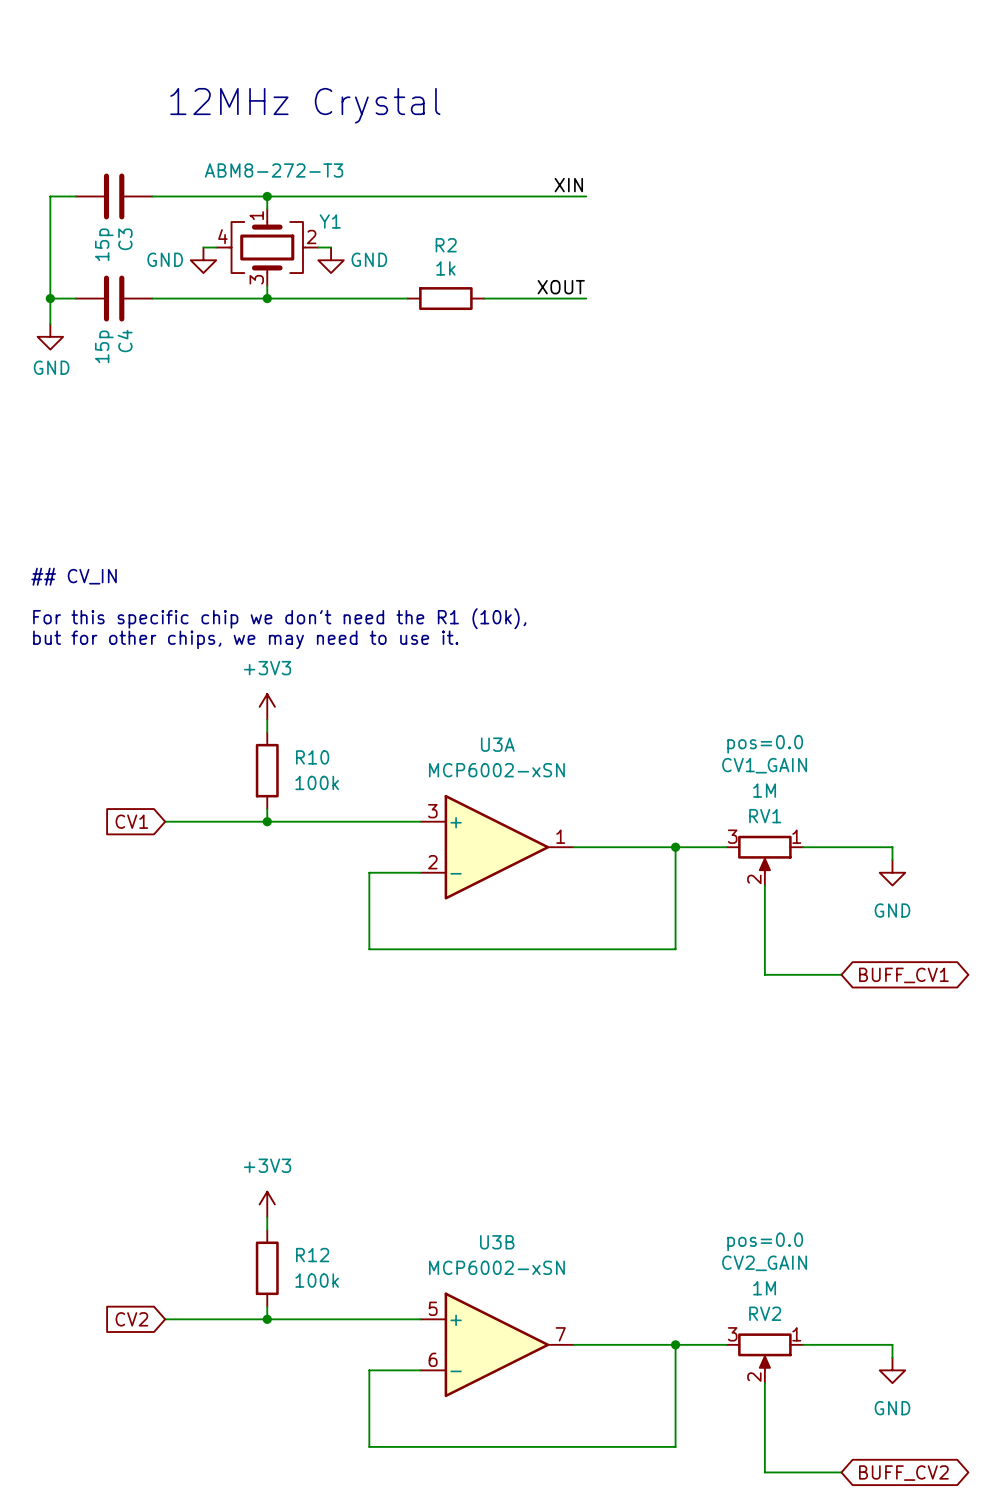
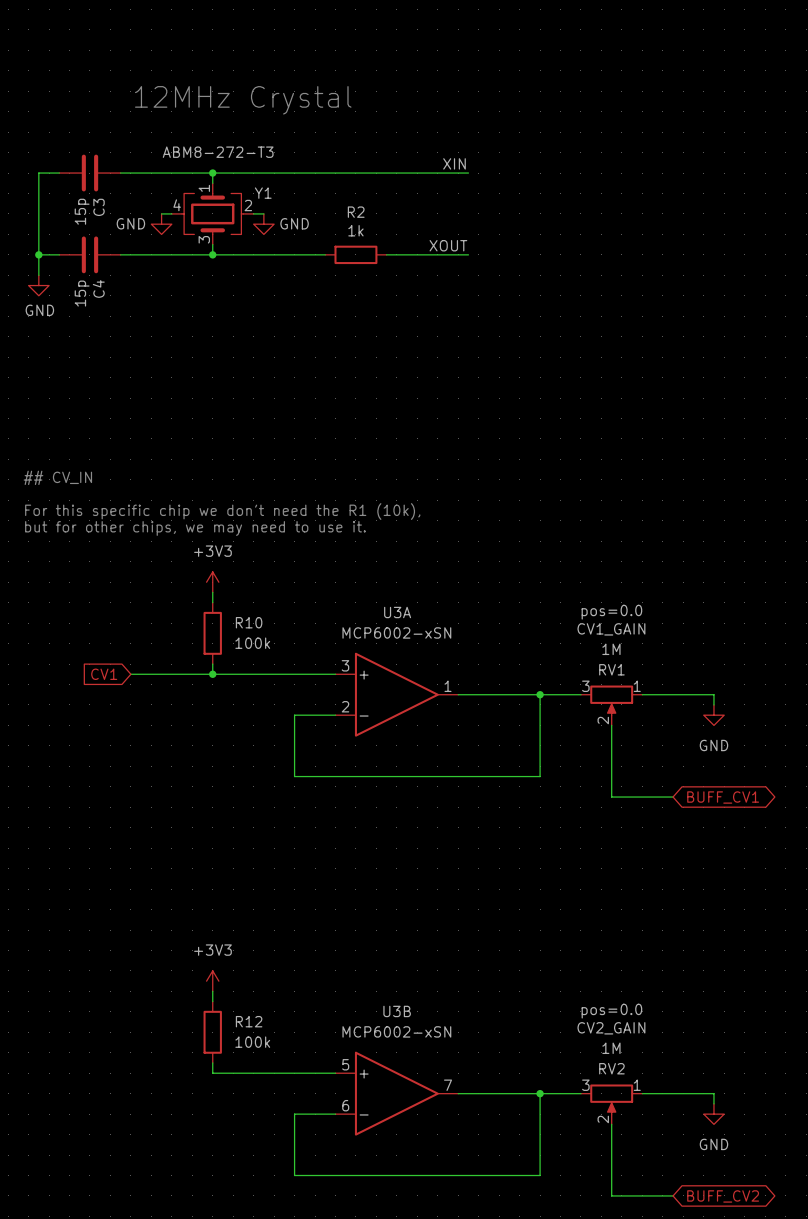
global label: CV2 (131, 1319) -> none
wire: (165, 1319) (267, 1319) -> none
junction: (267, 1319) -> none

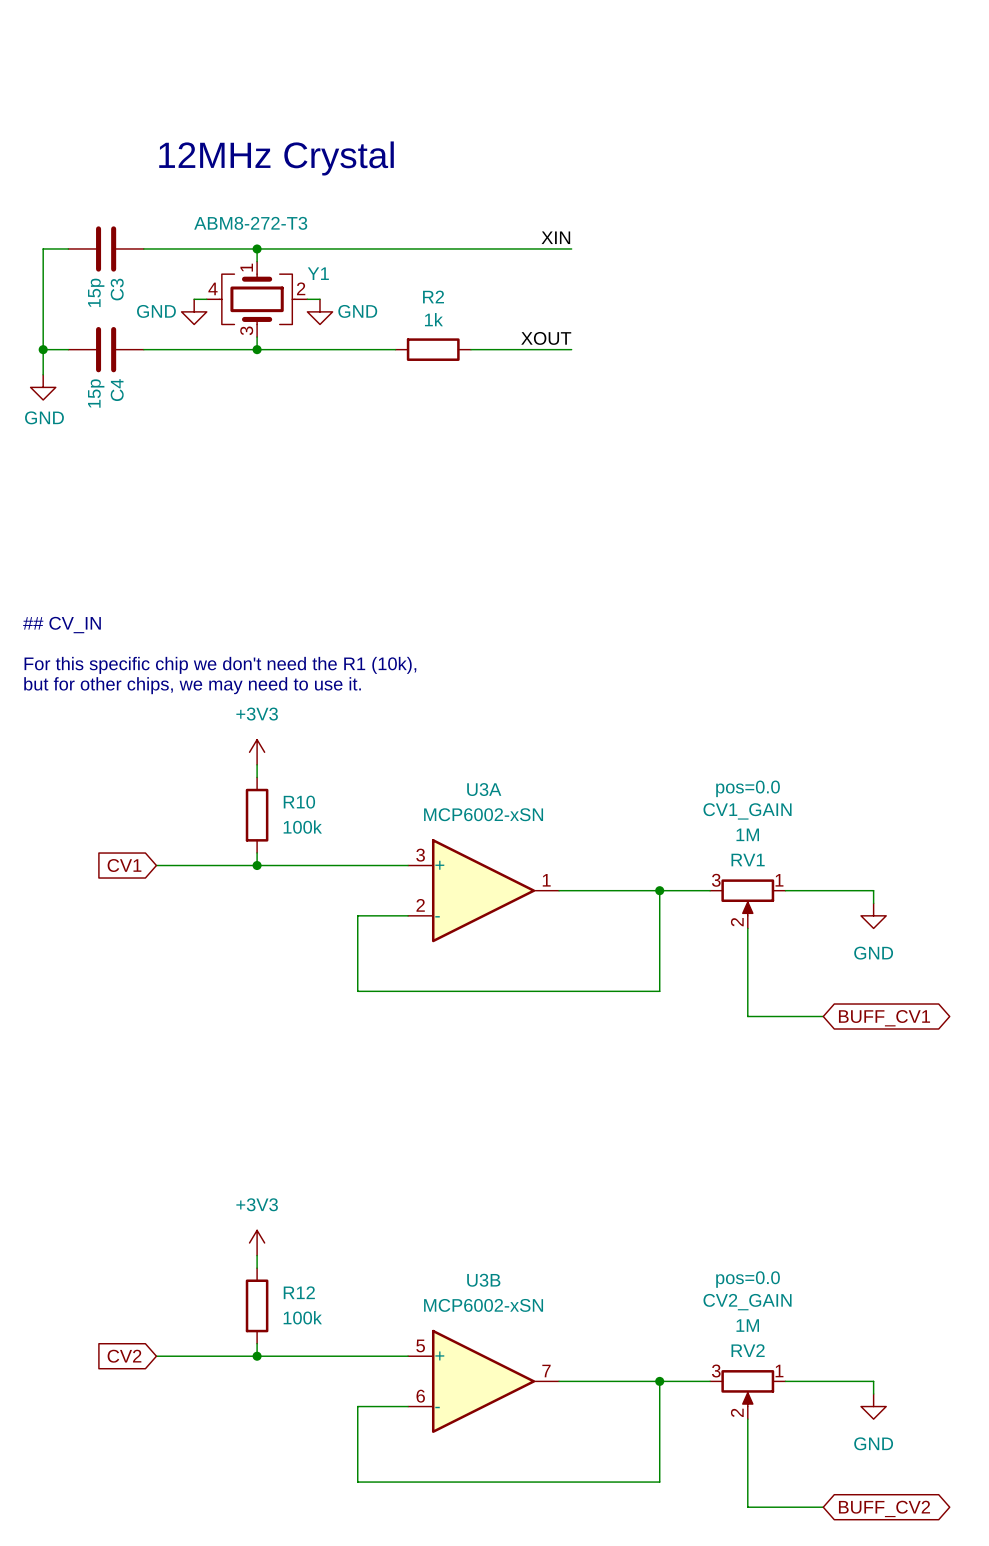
global label: none -> CV2 (124, 1356)
wire: none -> (156, 1356) (257, 1356)
junction: none -> (257, 1356)

